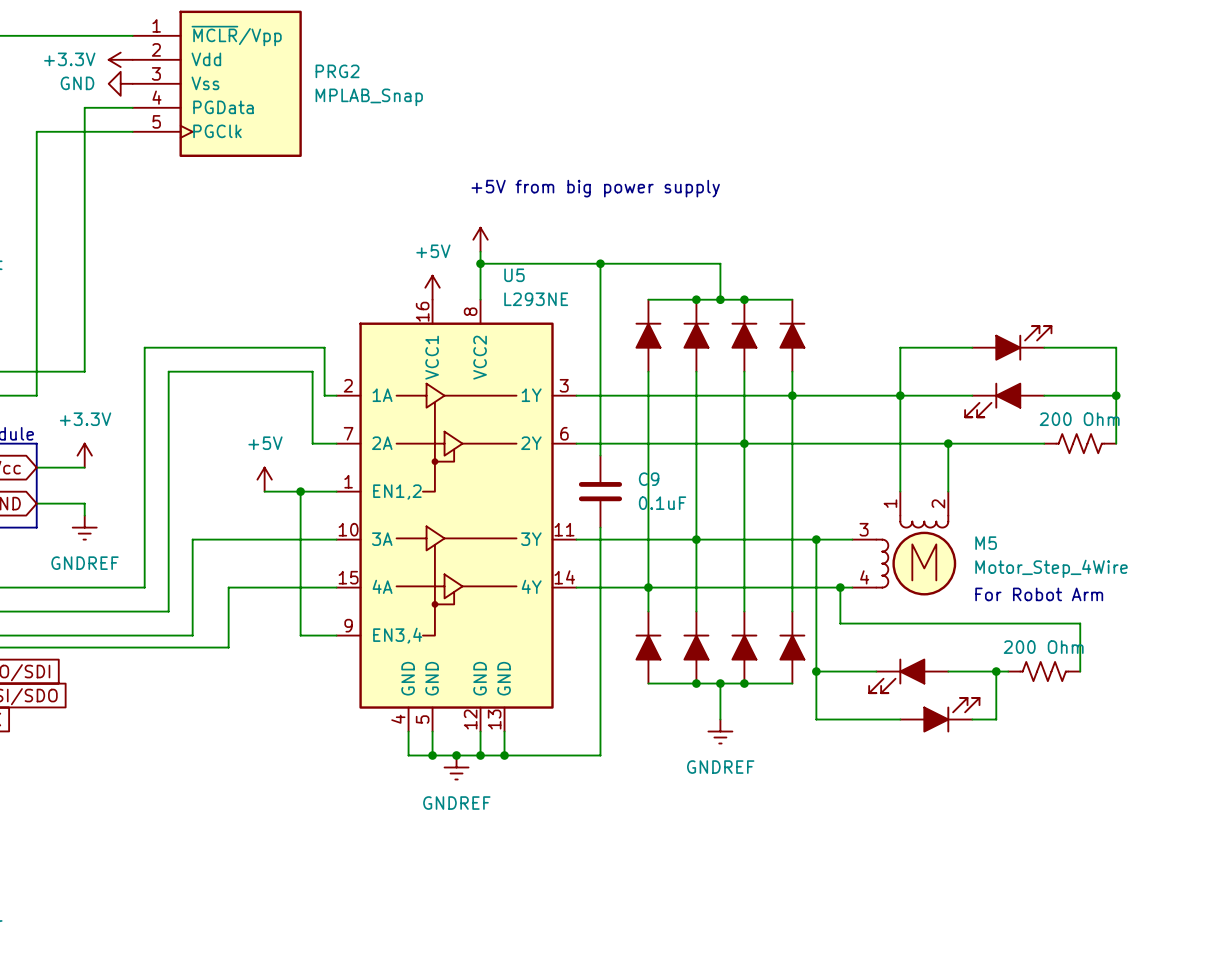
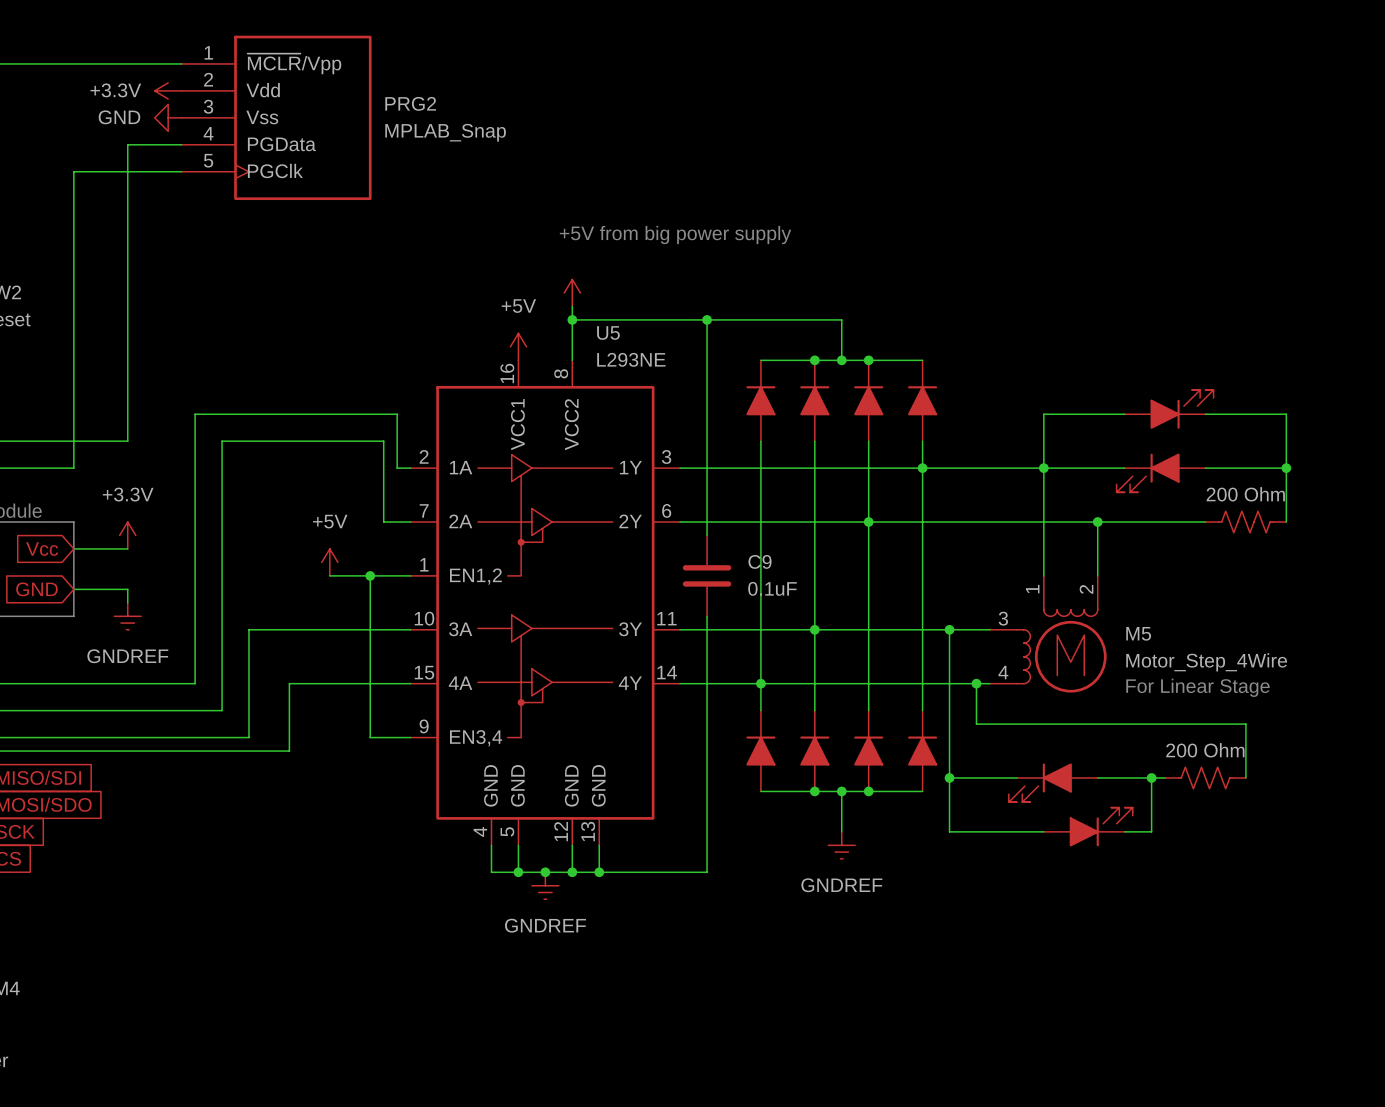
text: For Robot Arm (1039, 594) -> For Linear Stage (1197, 687)

